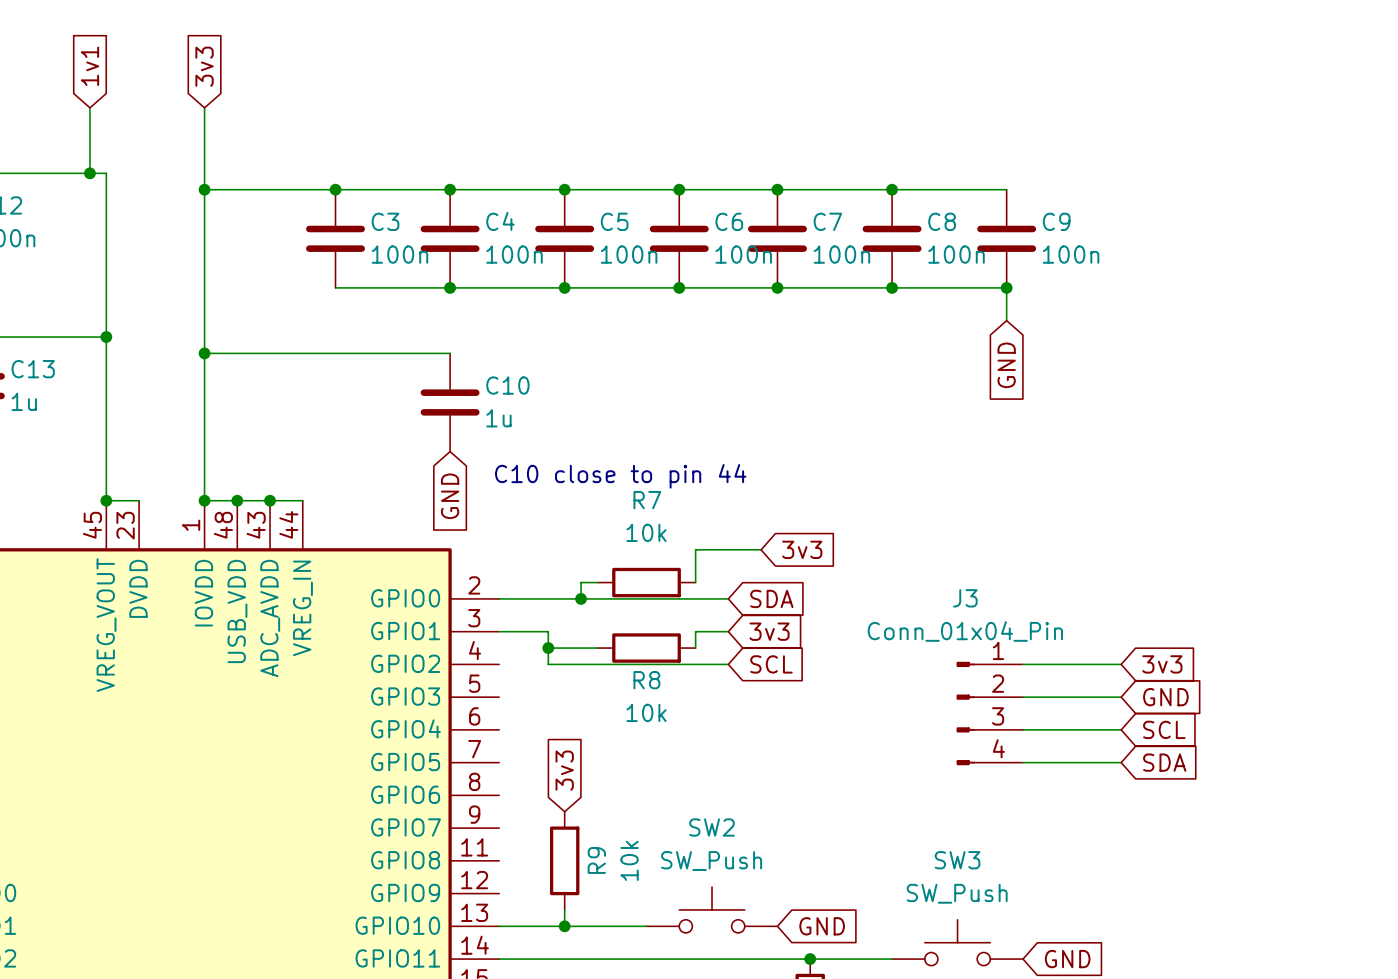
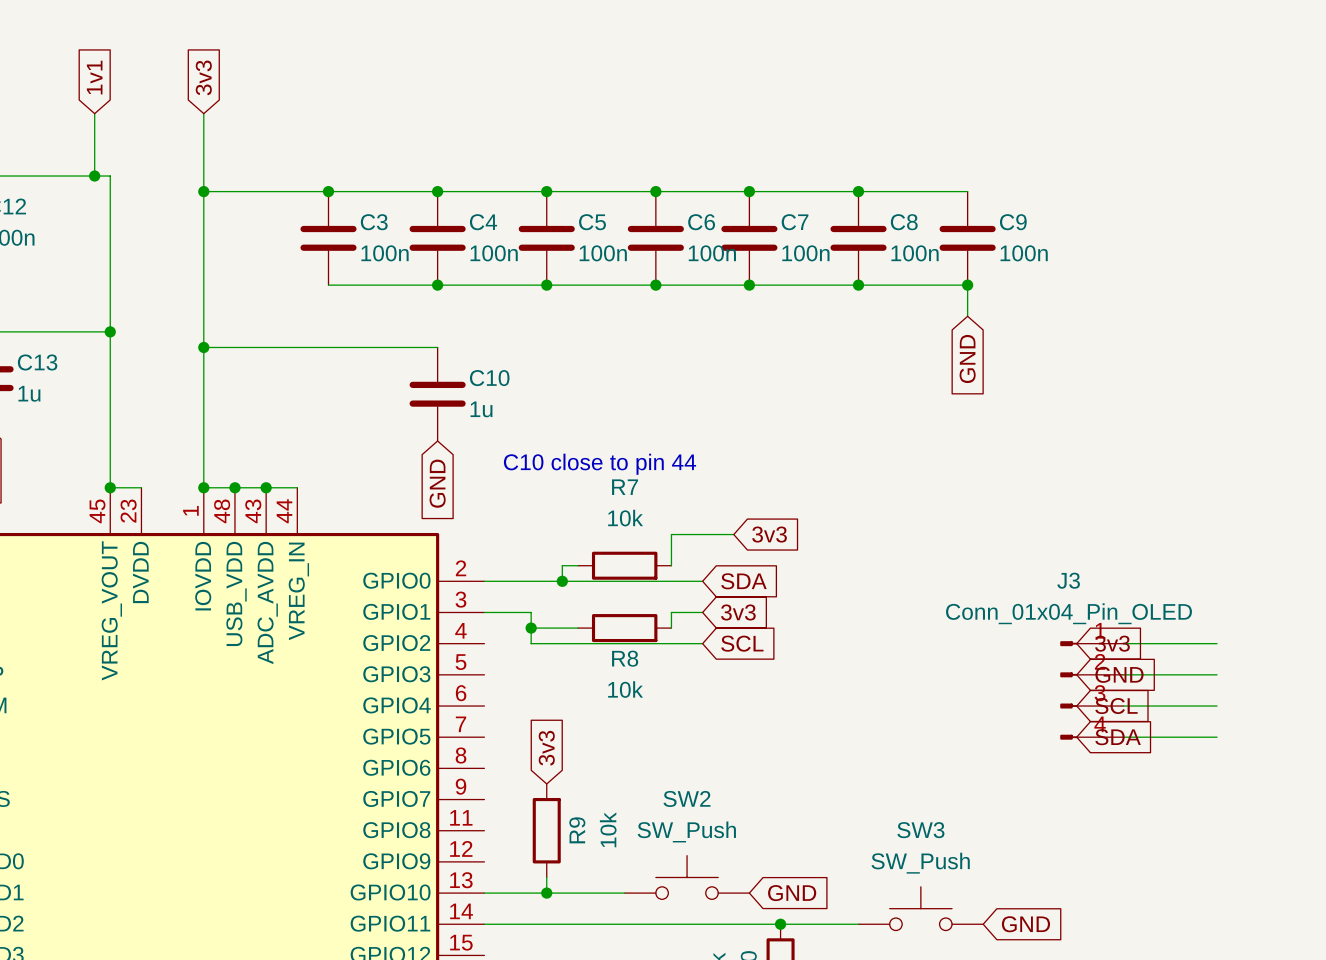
J3 value: Conn_01x04_Pin (965, 631) -> Conn_01x04_Pin_OLED (1068, 613)
wire: (1023, 664) (1121, 664) -> (1123, 643) (1217, 643)
wire: (1023, 697) (1121, 697) -> (1123, 674) (1217, 674)
J3 position: (989, 713) -> (1091, 690)
wire: (1023, 729) (1121, 729) -> (1123, 706) (1217, 706)
wire: (1023, 762) (1121, 762) -> (1123, 737) (1217, 737)

